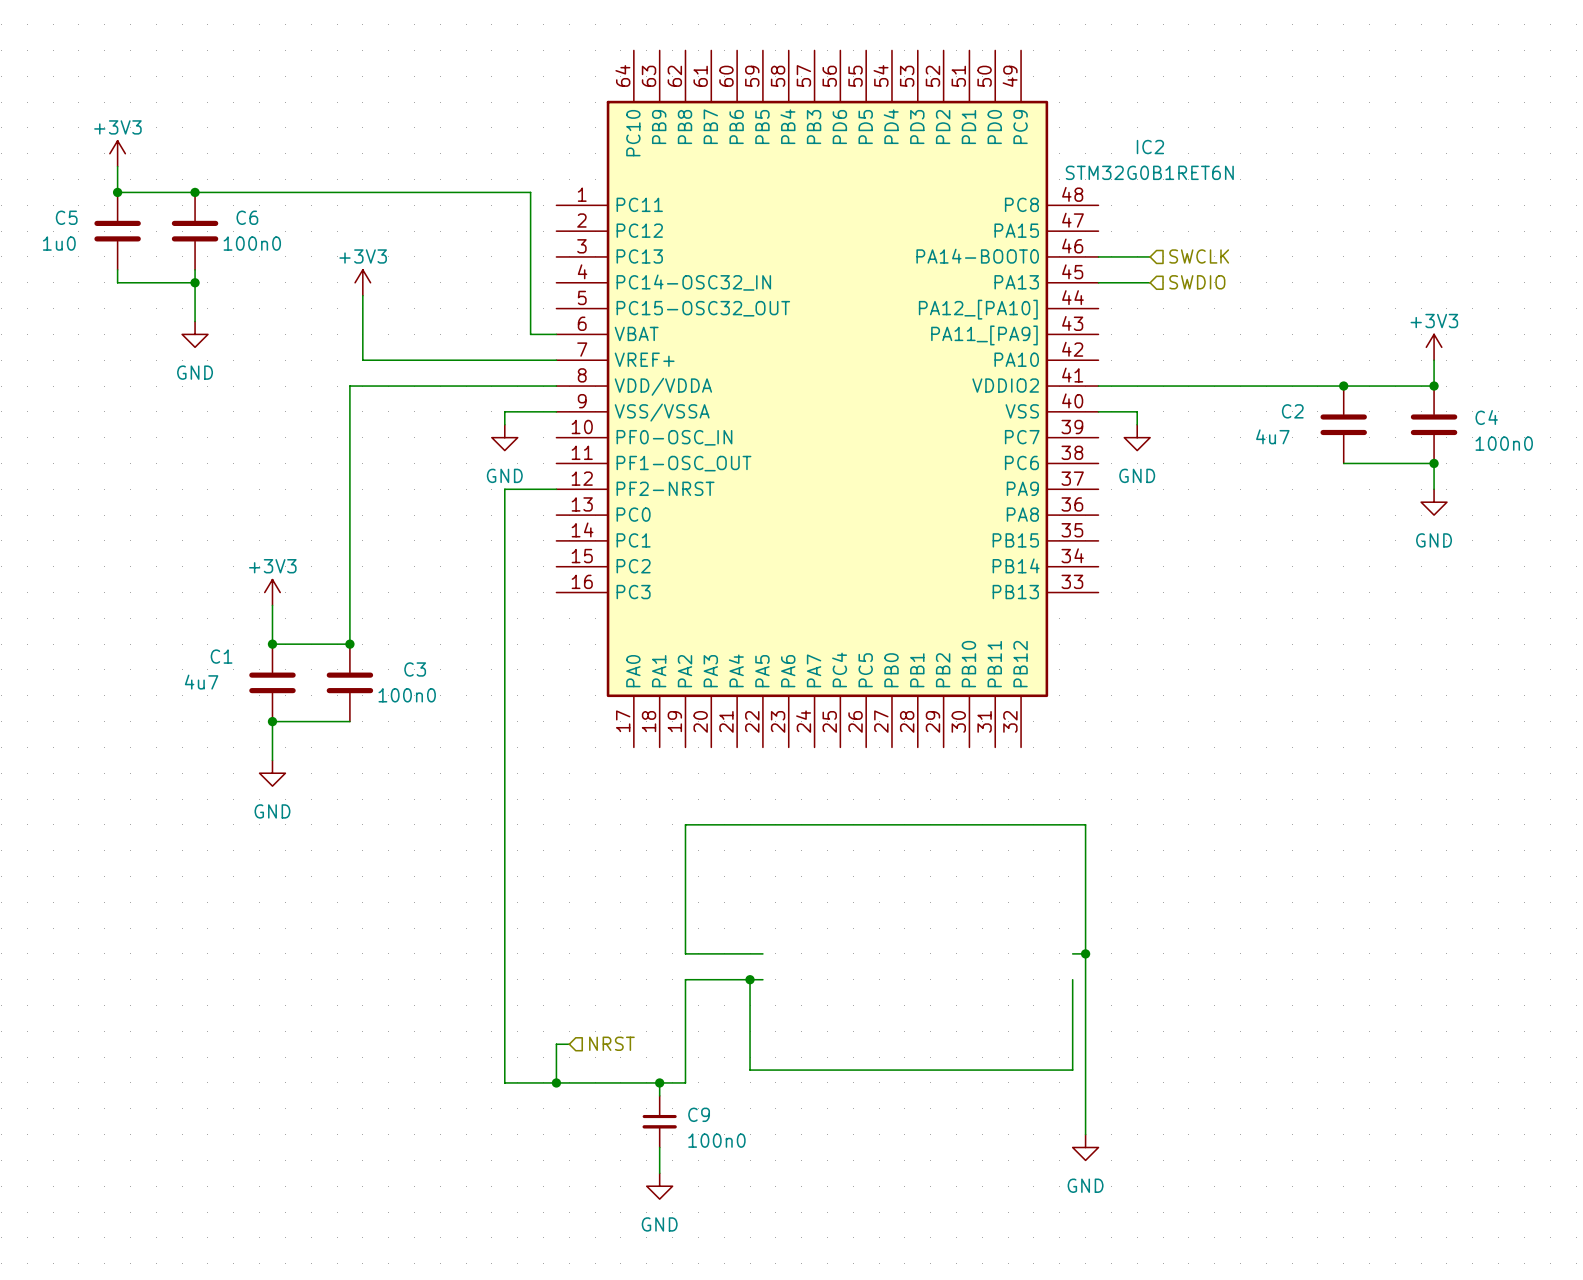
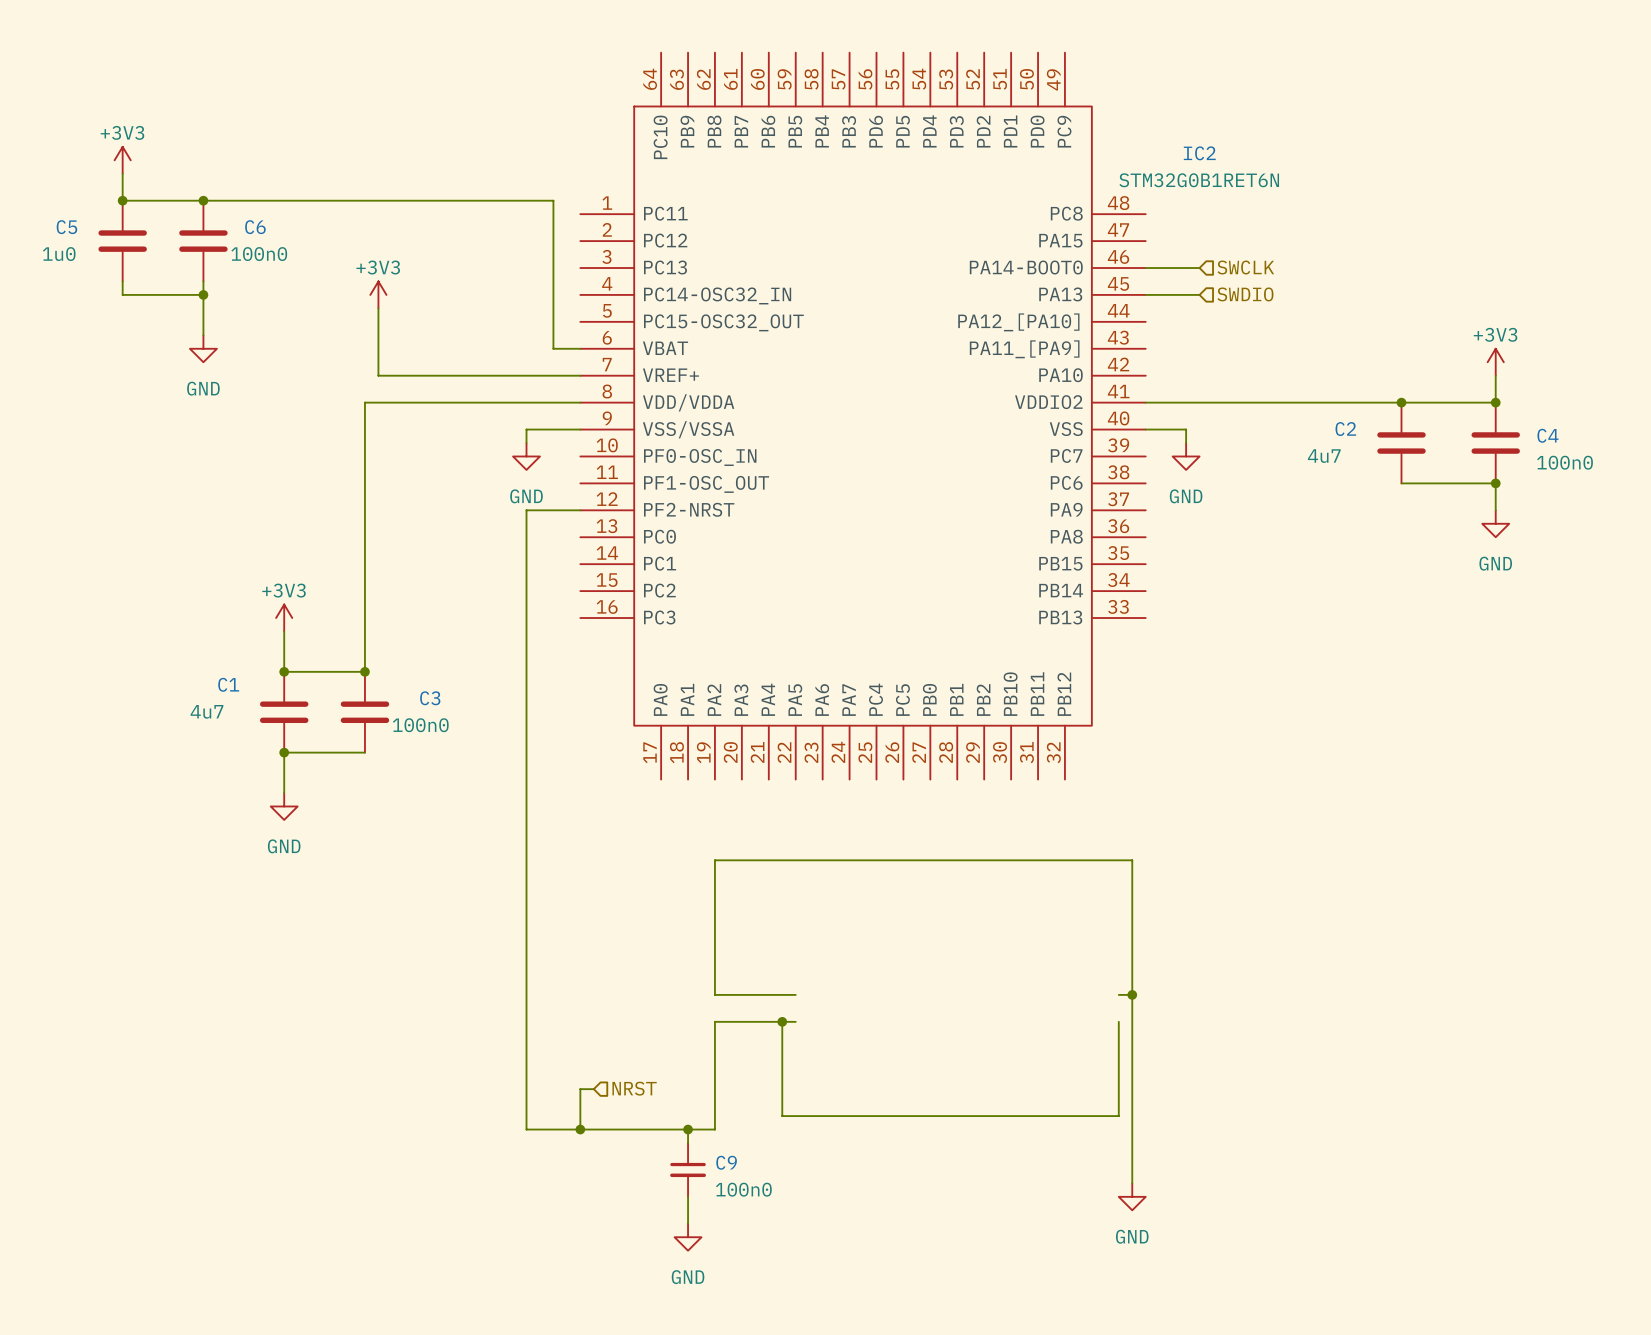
IC2 symbol: [556, 50, 1099, 748] -> [580, 52, 1146, 780]

